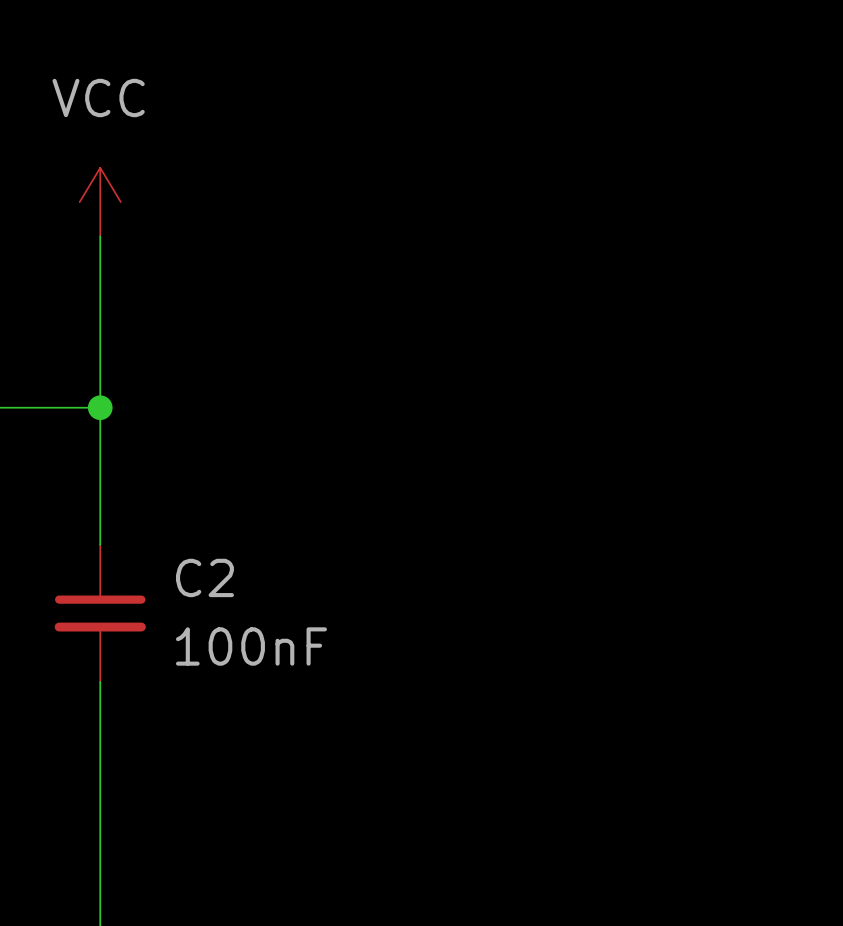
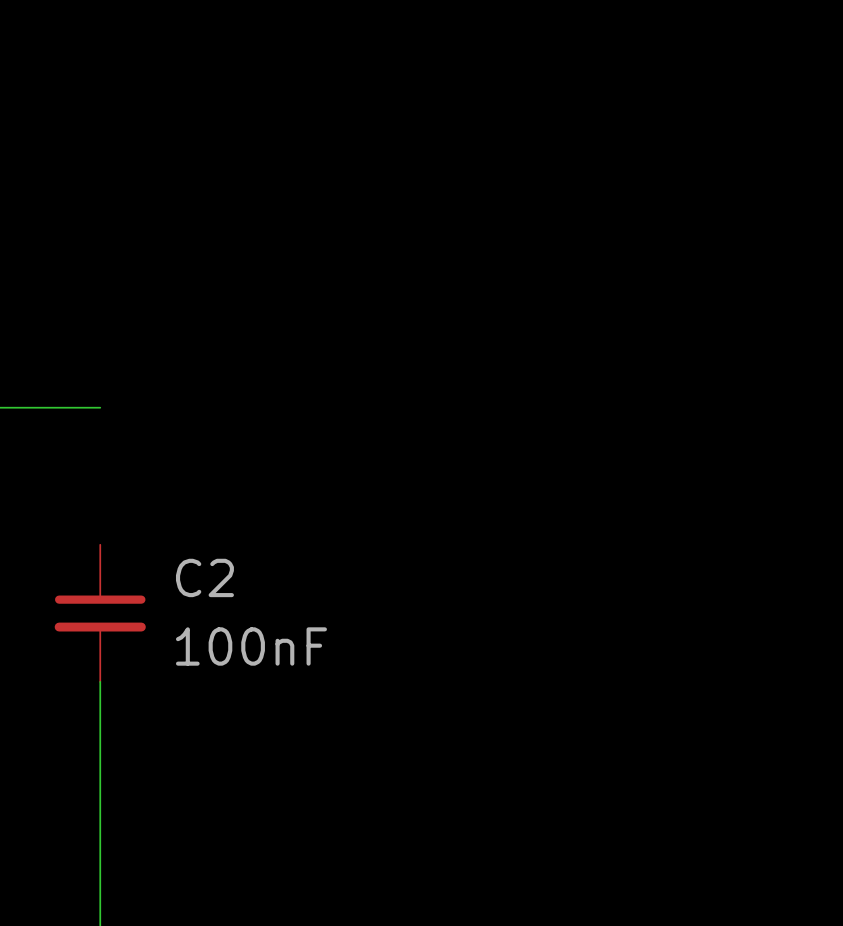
power symbol: VCC (100, 202) -> none
wire: (100, 236) (100, 544) -> none
junction: (100, 407) -> none

